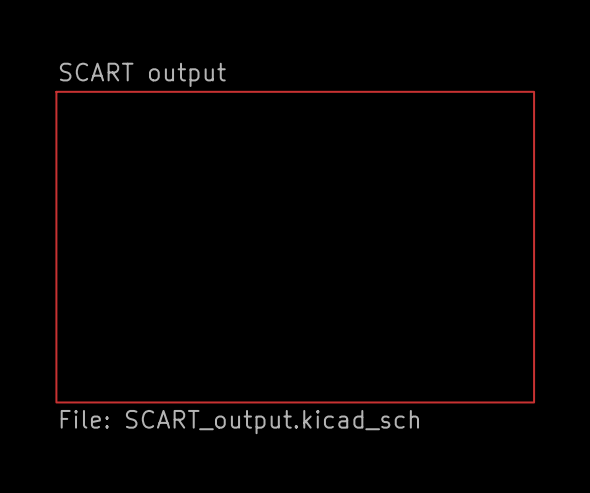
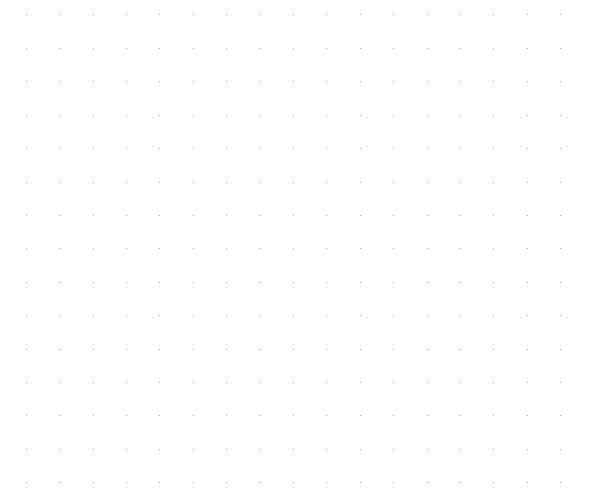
sheet SCART output: File: SCART_output.kicad_sch (295, 247) -> none

